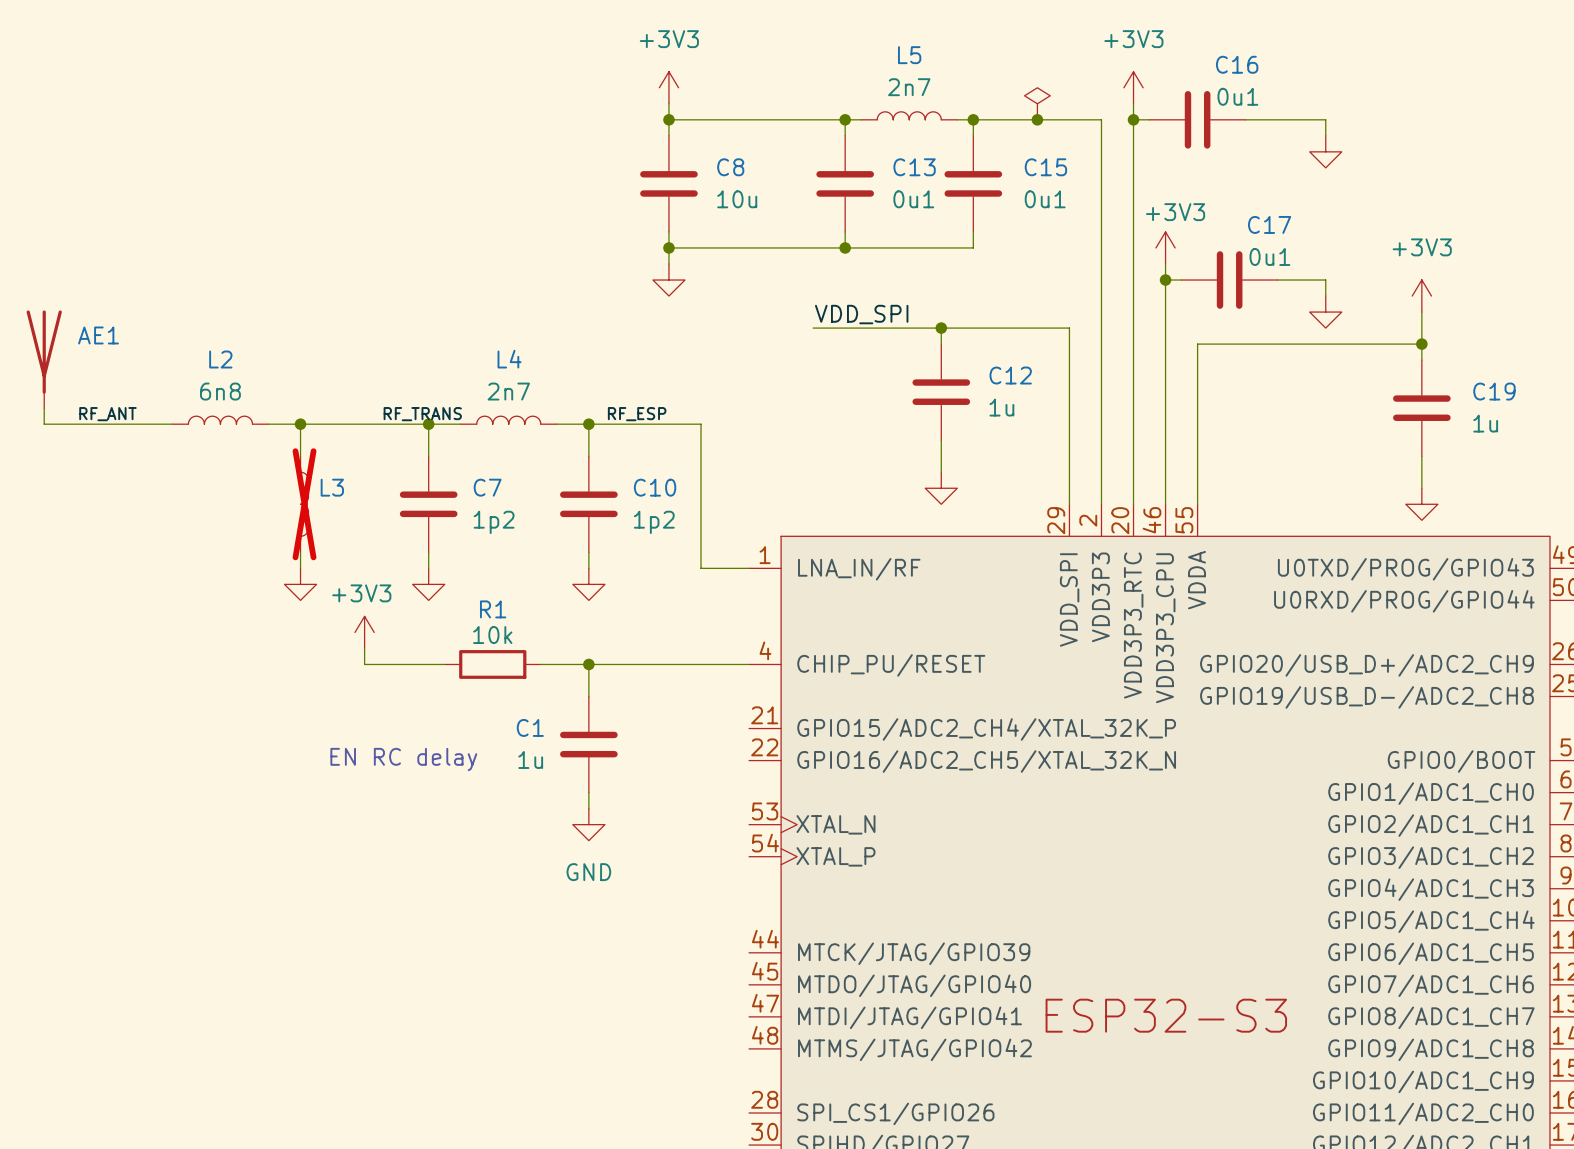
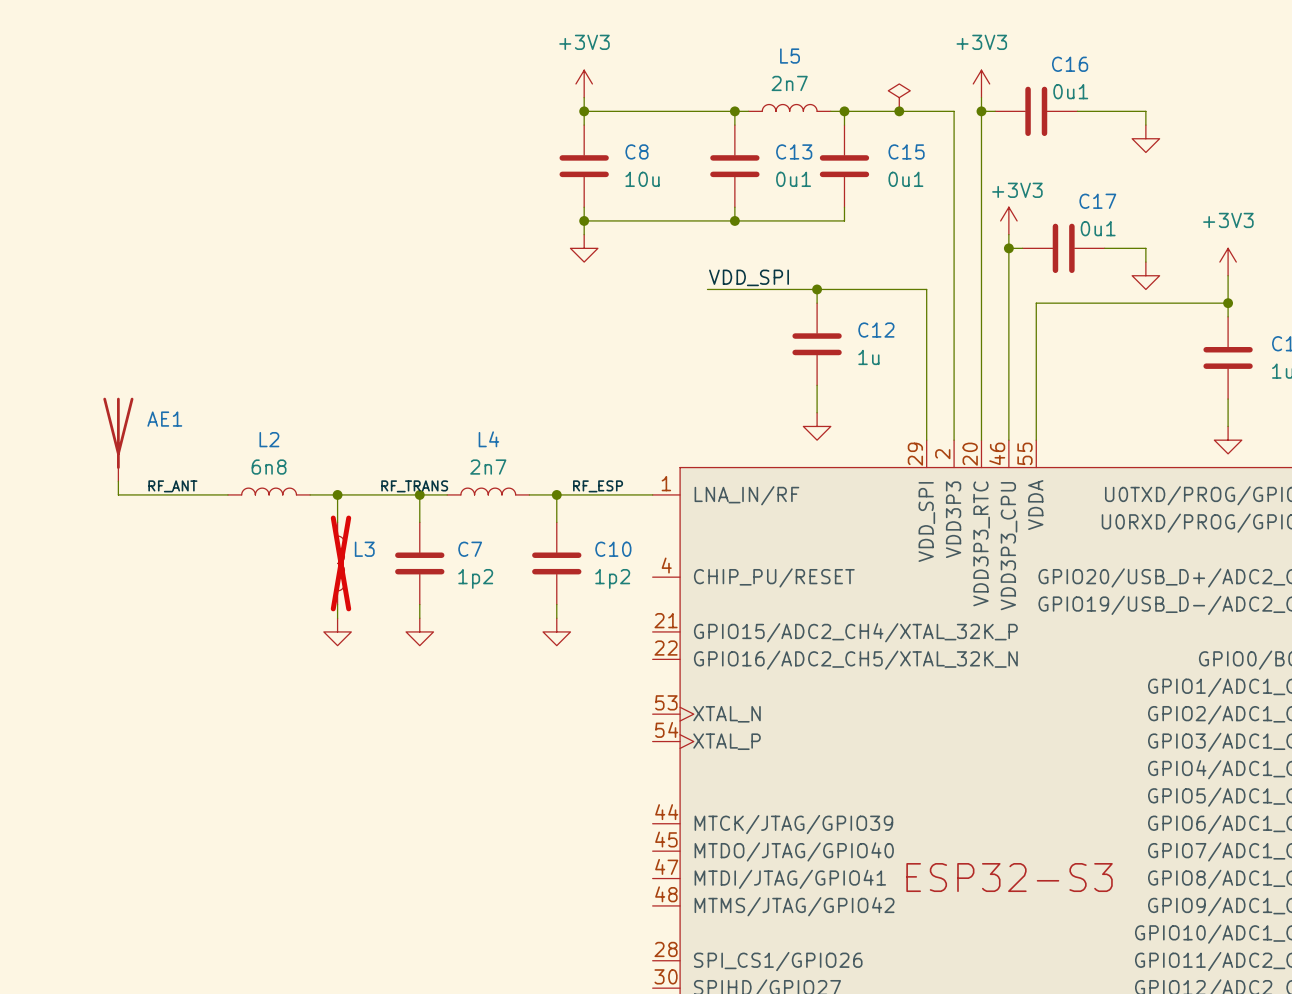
AE1 position: (44, 359) -> (118, 439)
wire: (44, 408) (44, 424) (172, 424) -> (118, 481) (118, 494) (227, 494)
label position: RF_ANT (107, 414) -> RF_ANT (172, 486)
label position: RF_TRANS (422, 414) -> RF_TRANS (414, 486)
label position: RF_ESP (637, 414) -> RF_ESP (598, 486)
L2 position: (220, 420) -> (269, 491)
L4 position: (508, 420) -> (488, 491)
wire: (268, 424) (460, 424) -> none
wire: (300, 424) (300, 456) -> (337, 494) (337, 522)
junction: (300, 424) -> none
wire: (428, 424) (428, 456) -> (419, 494) (419, 522)
junction: (428, 424) -> none
wire: (556, 424) (701, 424) (701, 568) -> (529, 494) (611, 494)
wire: (588, 424) (588, 456) -> (556, 494) (556, 522)
junction: (588, 424) -> none
L3 position: (304, 504) -> (340, 563)
C7 position: (428, 504) -> (419, 563)
C10 position: (588, 504) -> (556, 563)
wire: (300, 552) (300, 568) -> (337, 604) (337, 618)
wire: (428, 552) (428, 568) -> (419, 604) (419, 618)
wire: (588, 552) (588, 568) -> (556, 604) (556, 618)
wire: none -> (310, 494) (447, 494)
junction: none -> (337, 494)
junction: none -> (419, 494)
junction: none -> (556, 494)
power symbol: (300, 584) -> none
power symbol: (428, 584) -> none
power symbol: (588, 584) -> none
power symbol: +3V3 (364, 632) -> none
wire: (364, 648) (364, 664) (444, 664) -> none
R1: 10k (492, 664) -> none
wire: (540, 664) (749, 664) -> none
wire: (588, 664) (588, 696) -> none
junction: (588, 664) -> none
power symbol: none -> (337, 631)
power symbol: none -> (419, 631)
power symbol: none -> (556, 631)
C1: 1u (588, 744) -> none
text: EN RC delay (403, 759) -> none
wire: (588, 792) (588, 808) -> none
power symbol: GND (588, 824) -> none

